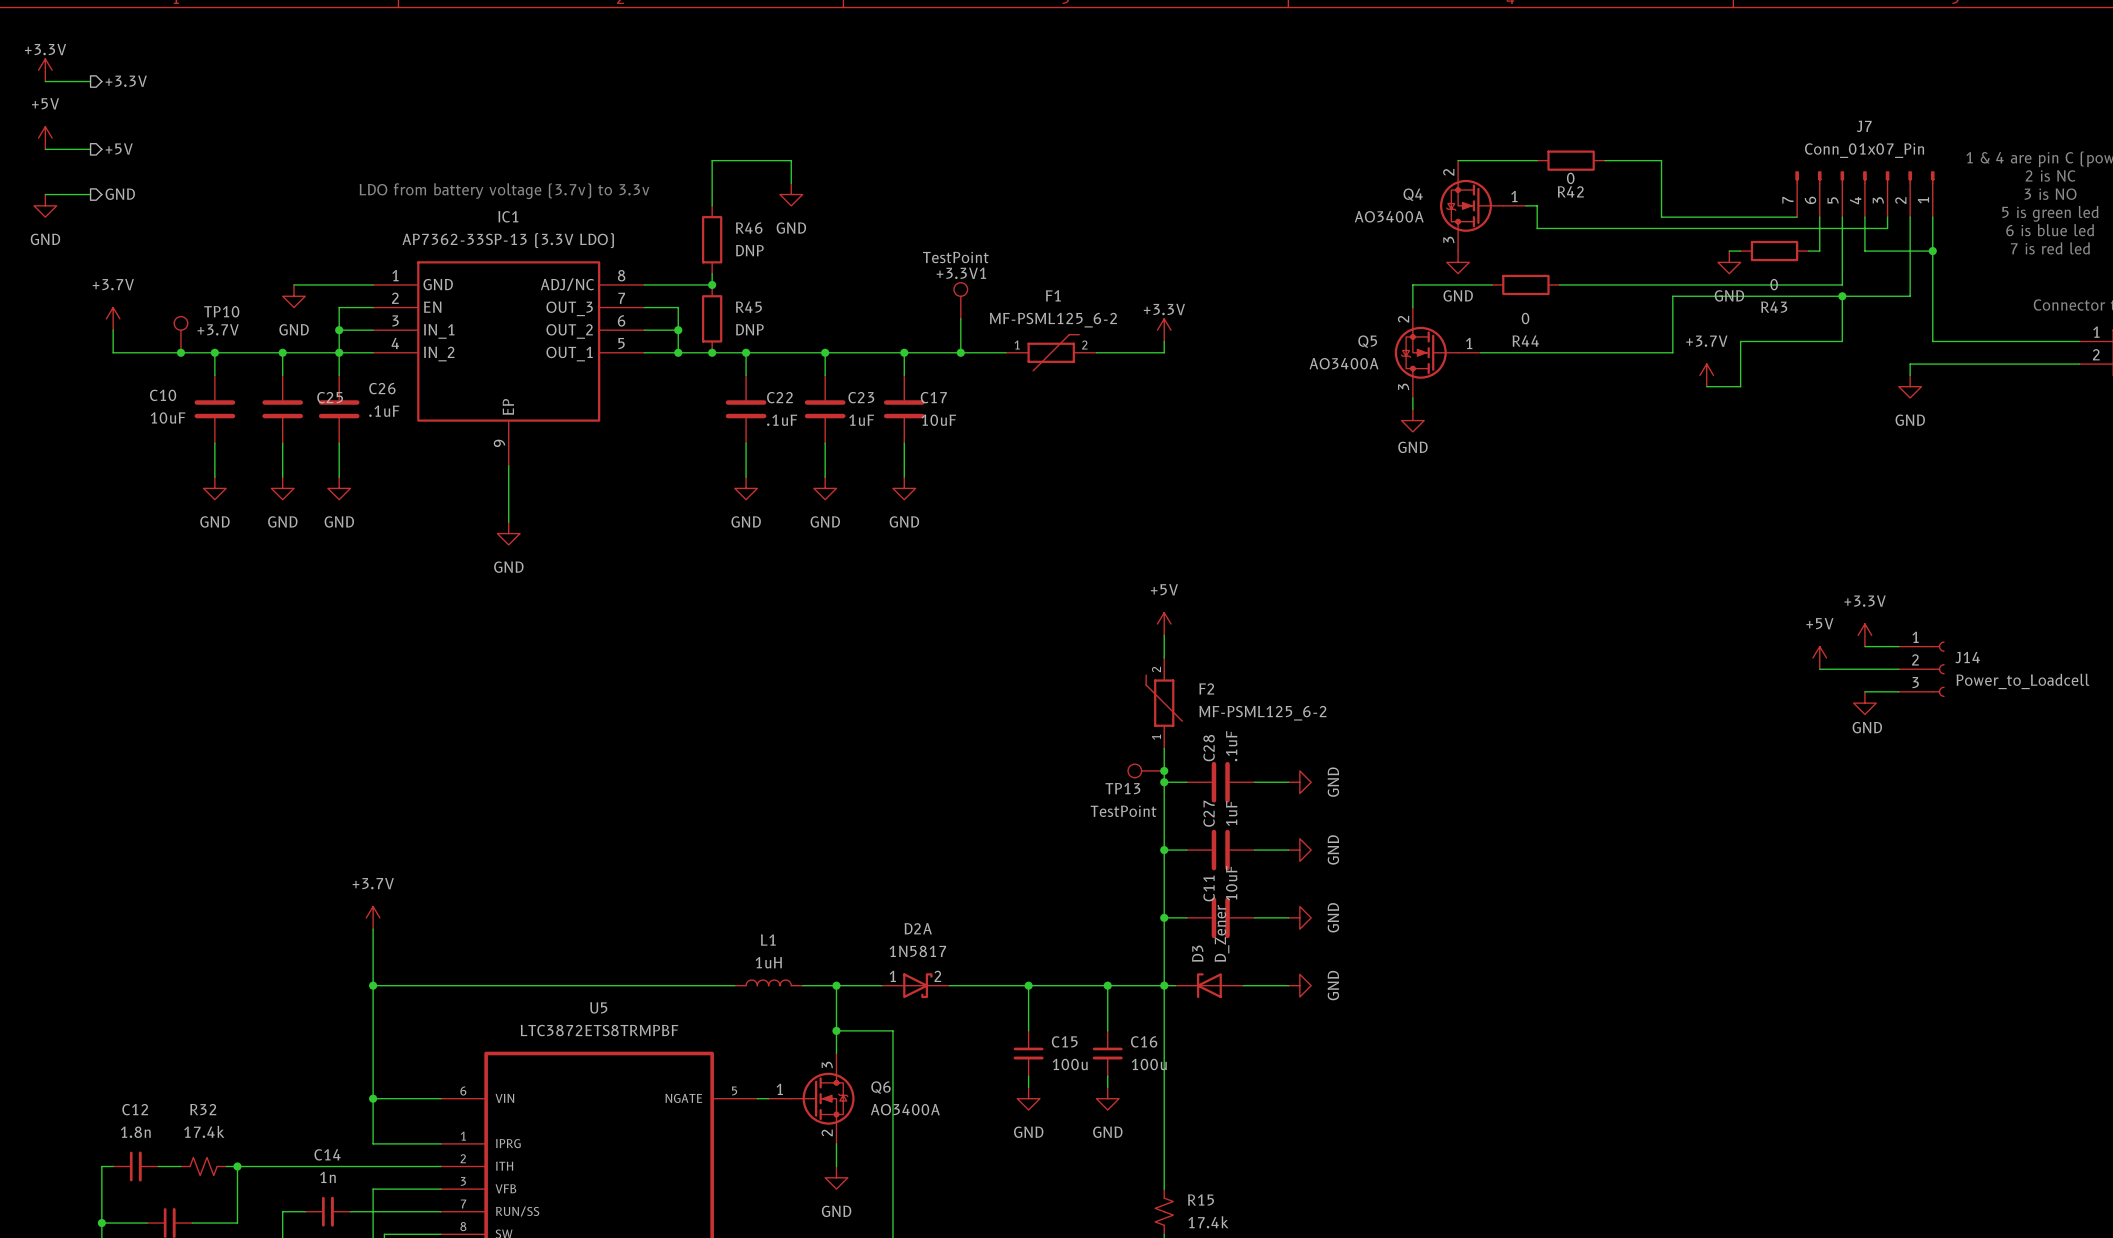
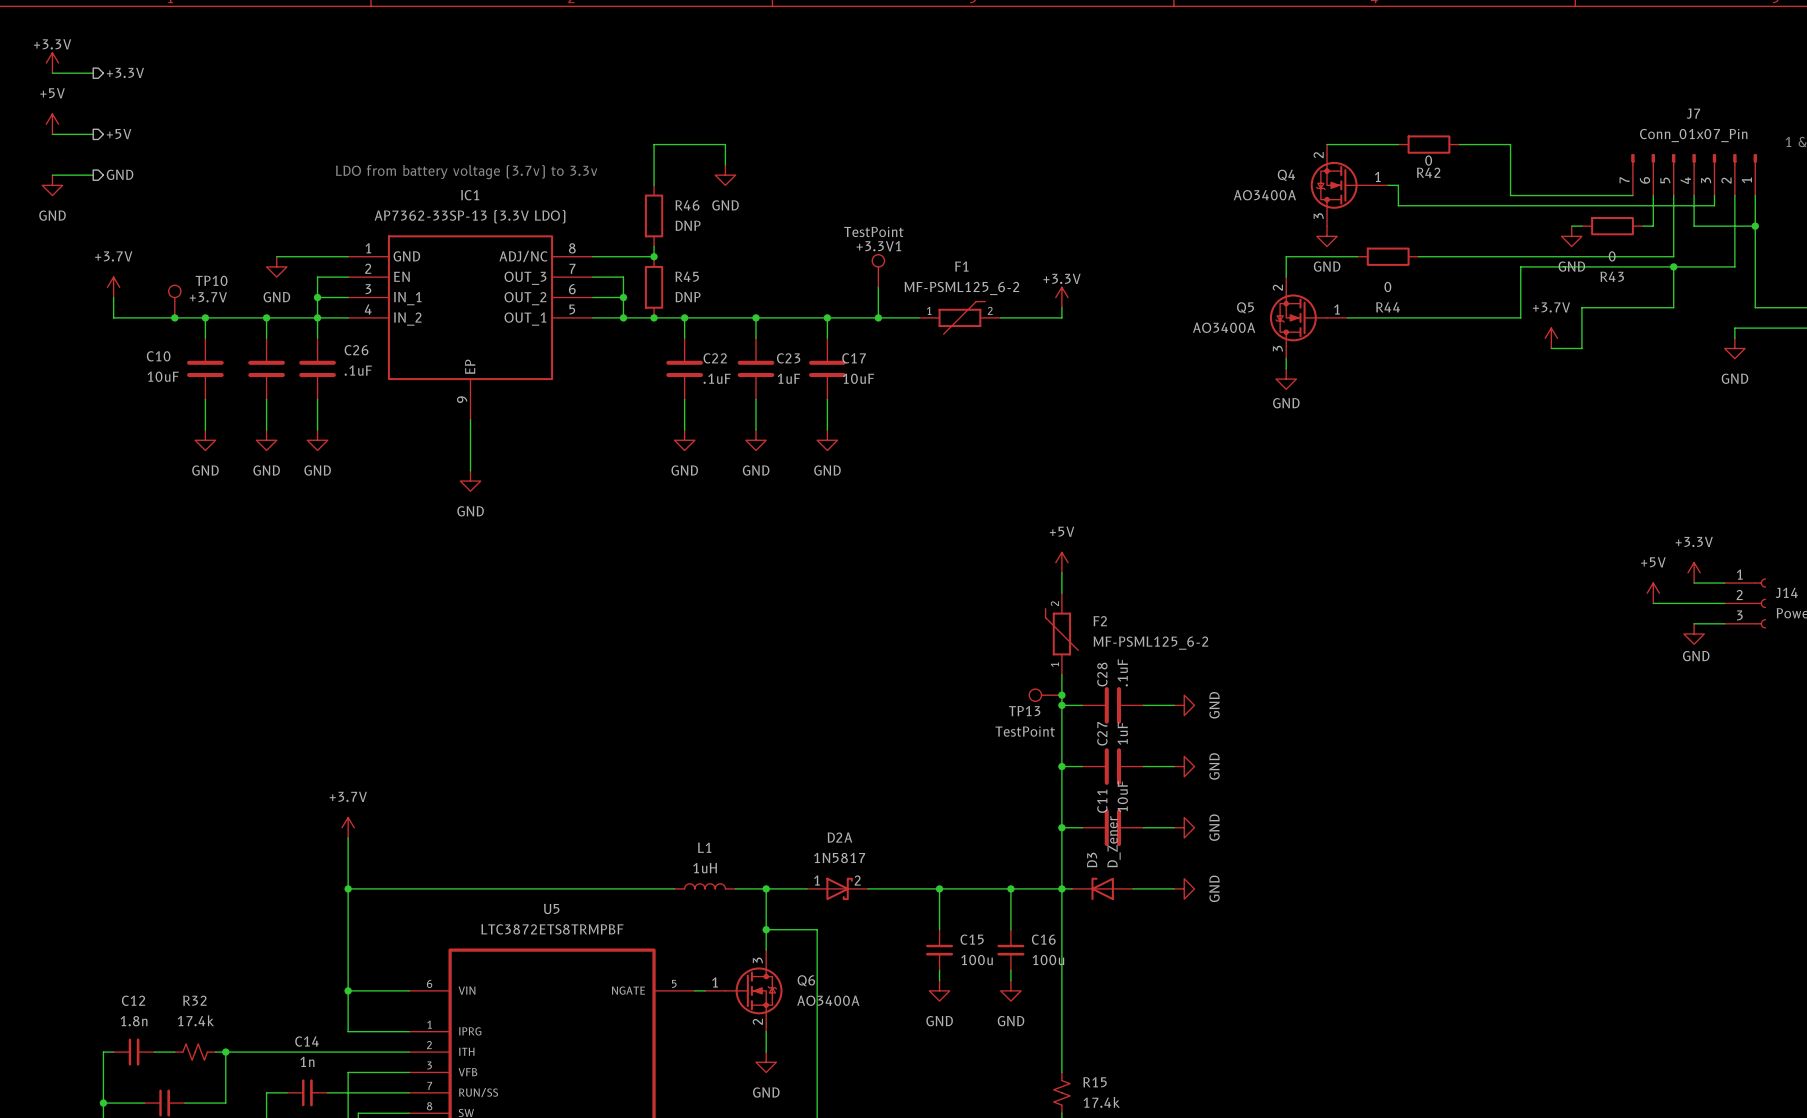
C25 name: C25 (330, 397) -> none

